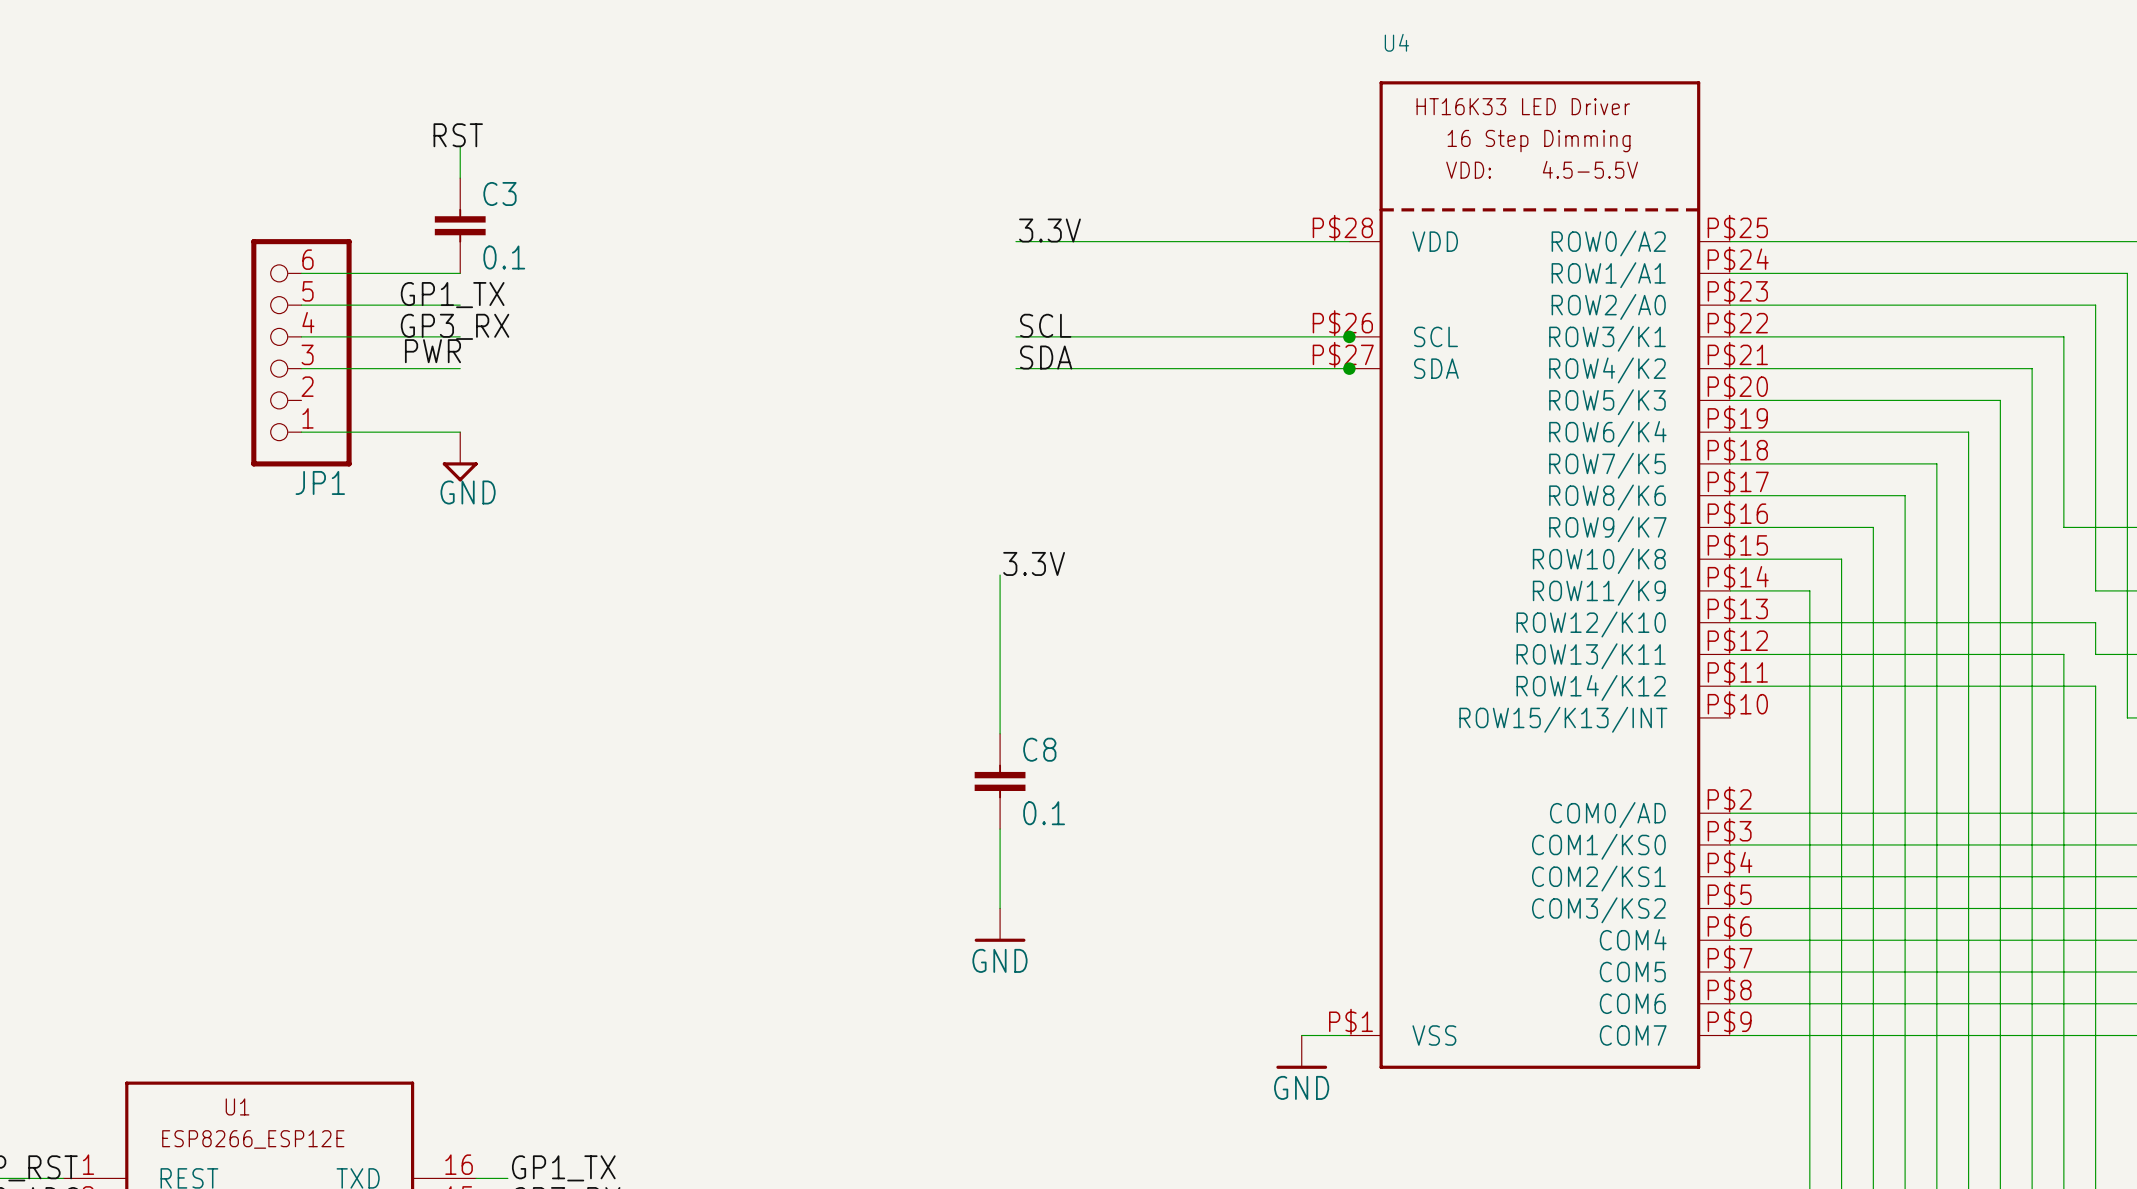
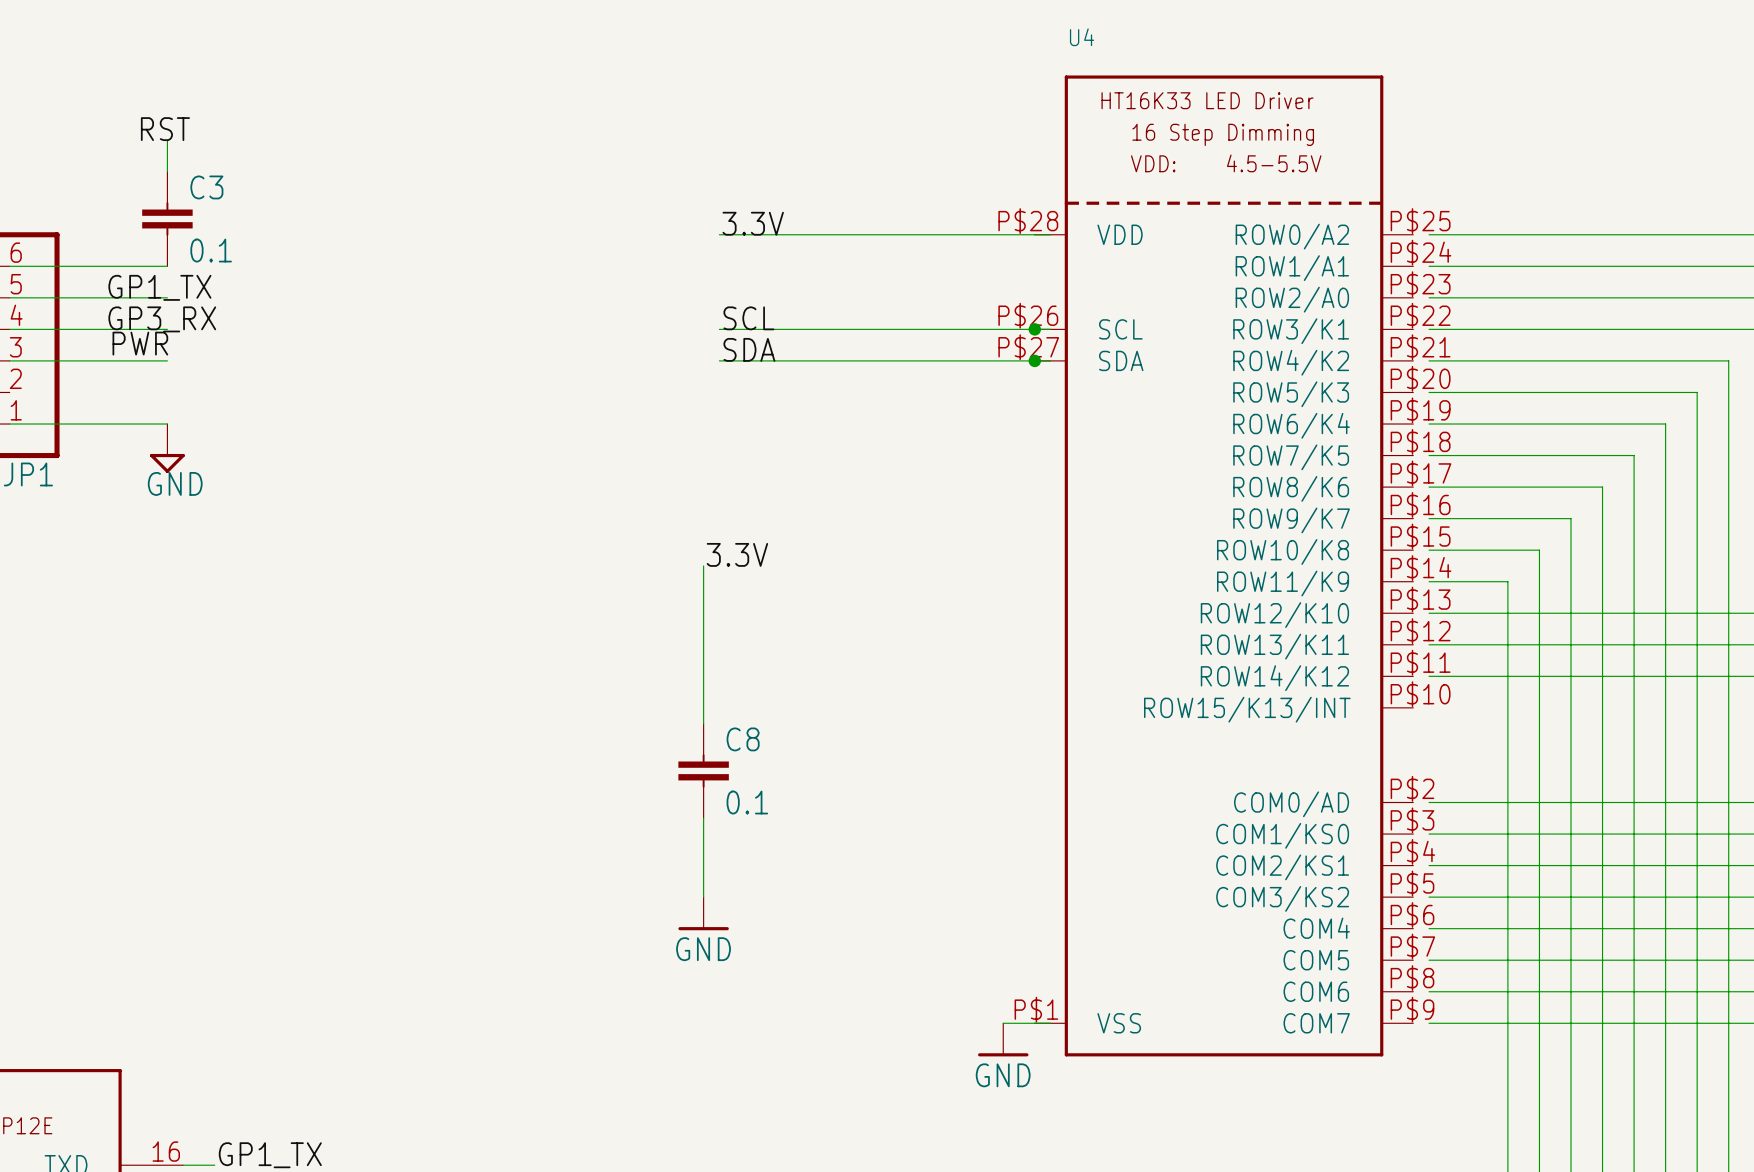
junction position: (1349, 336) -> (1034, 329)
junction position: (1349, 368) -> (1034, 360)
U4 position: (1539, 575) -> (1224, 565)

